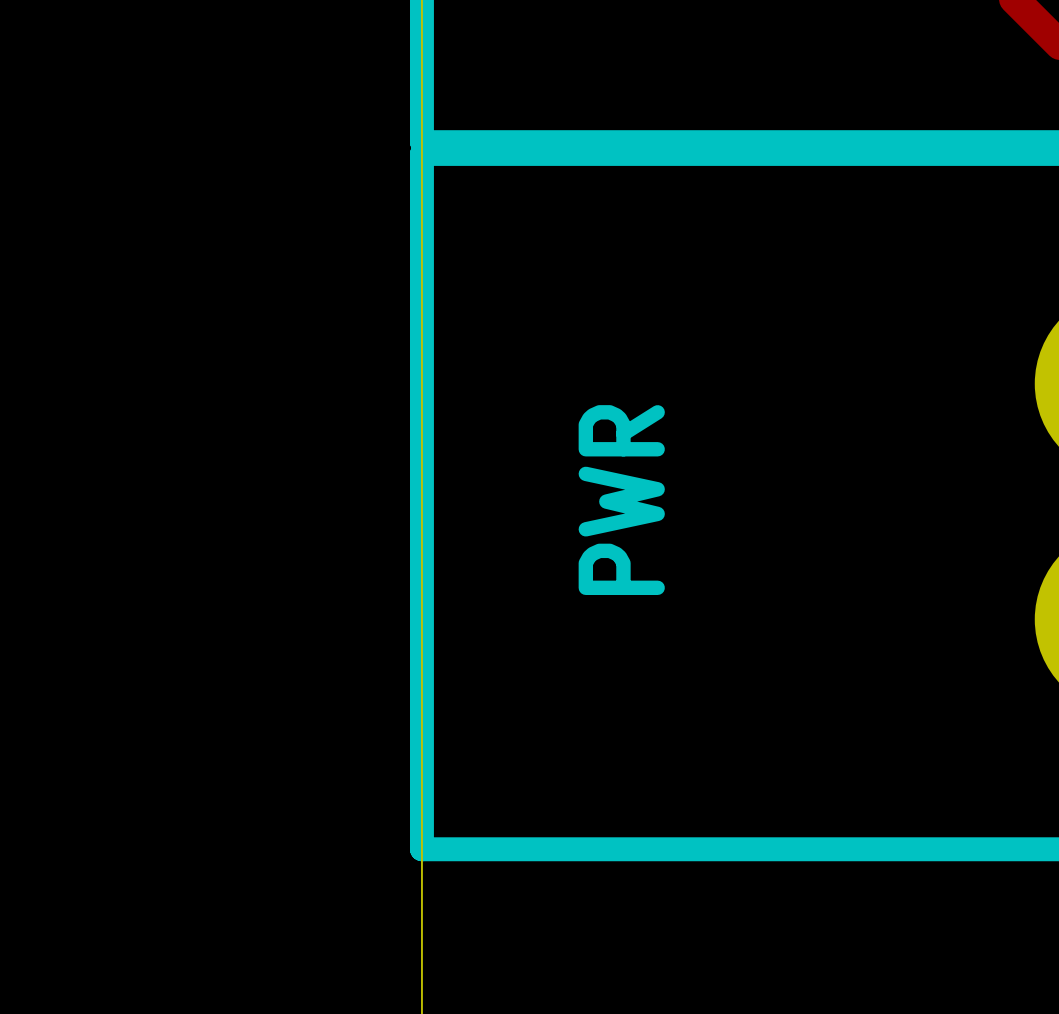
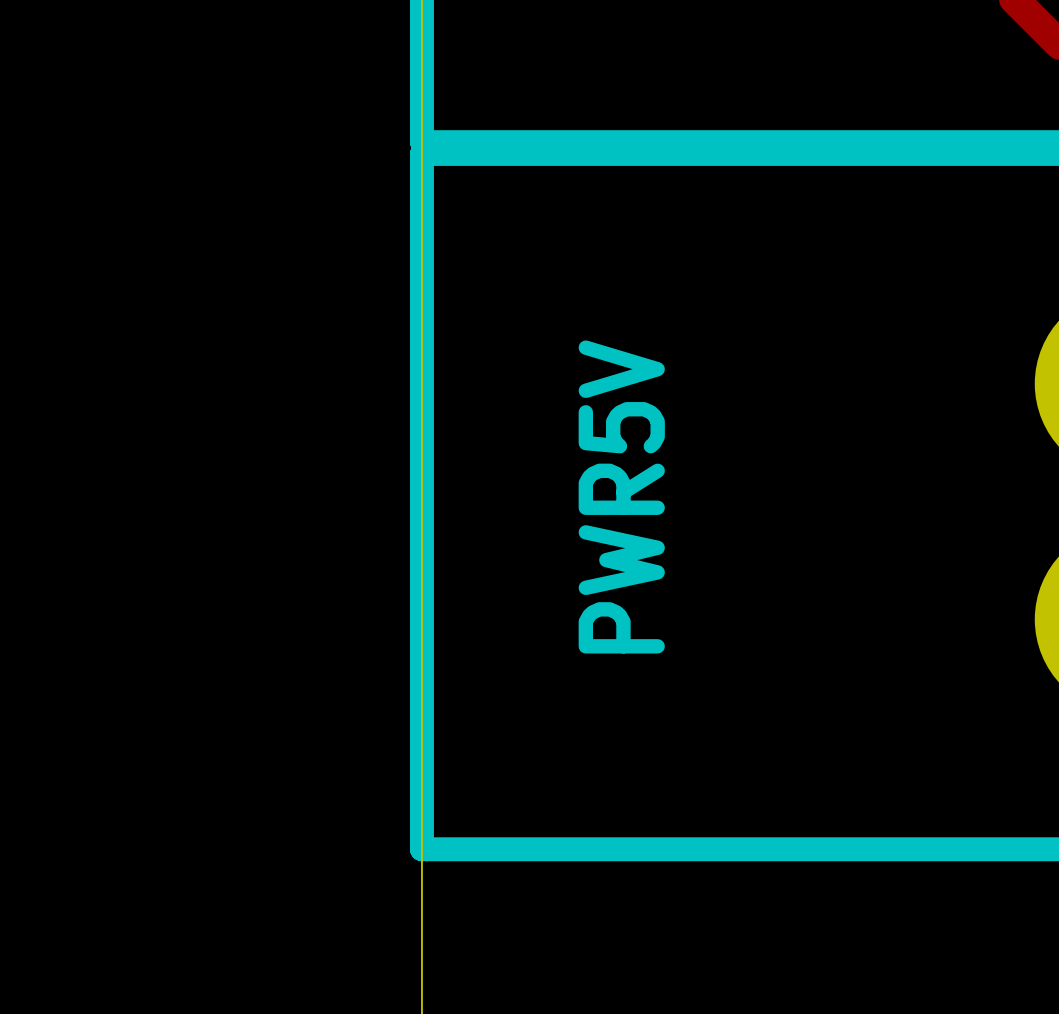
PWR name: PWR (621, 500) -> PWR5V (621, 496)

